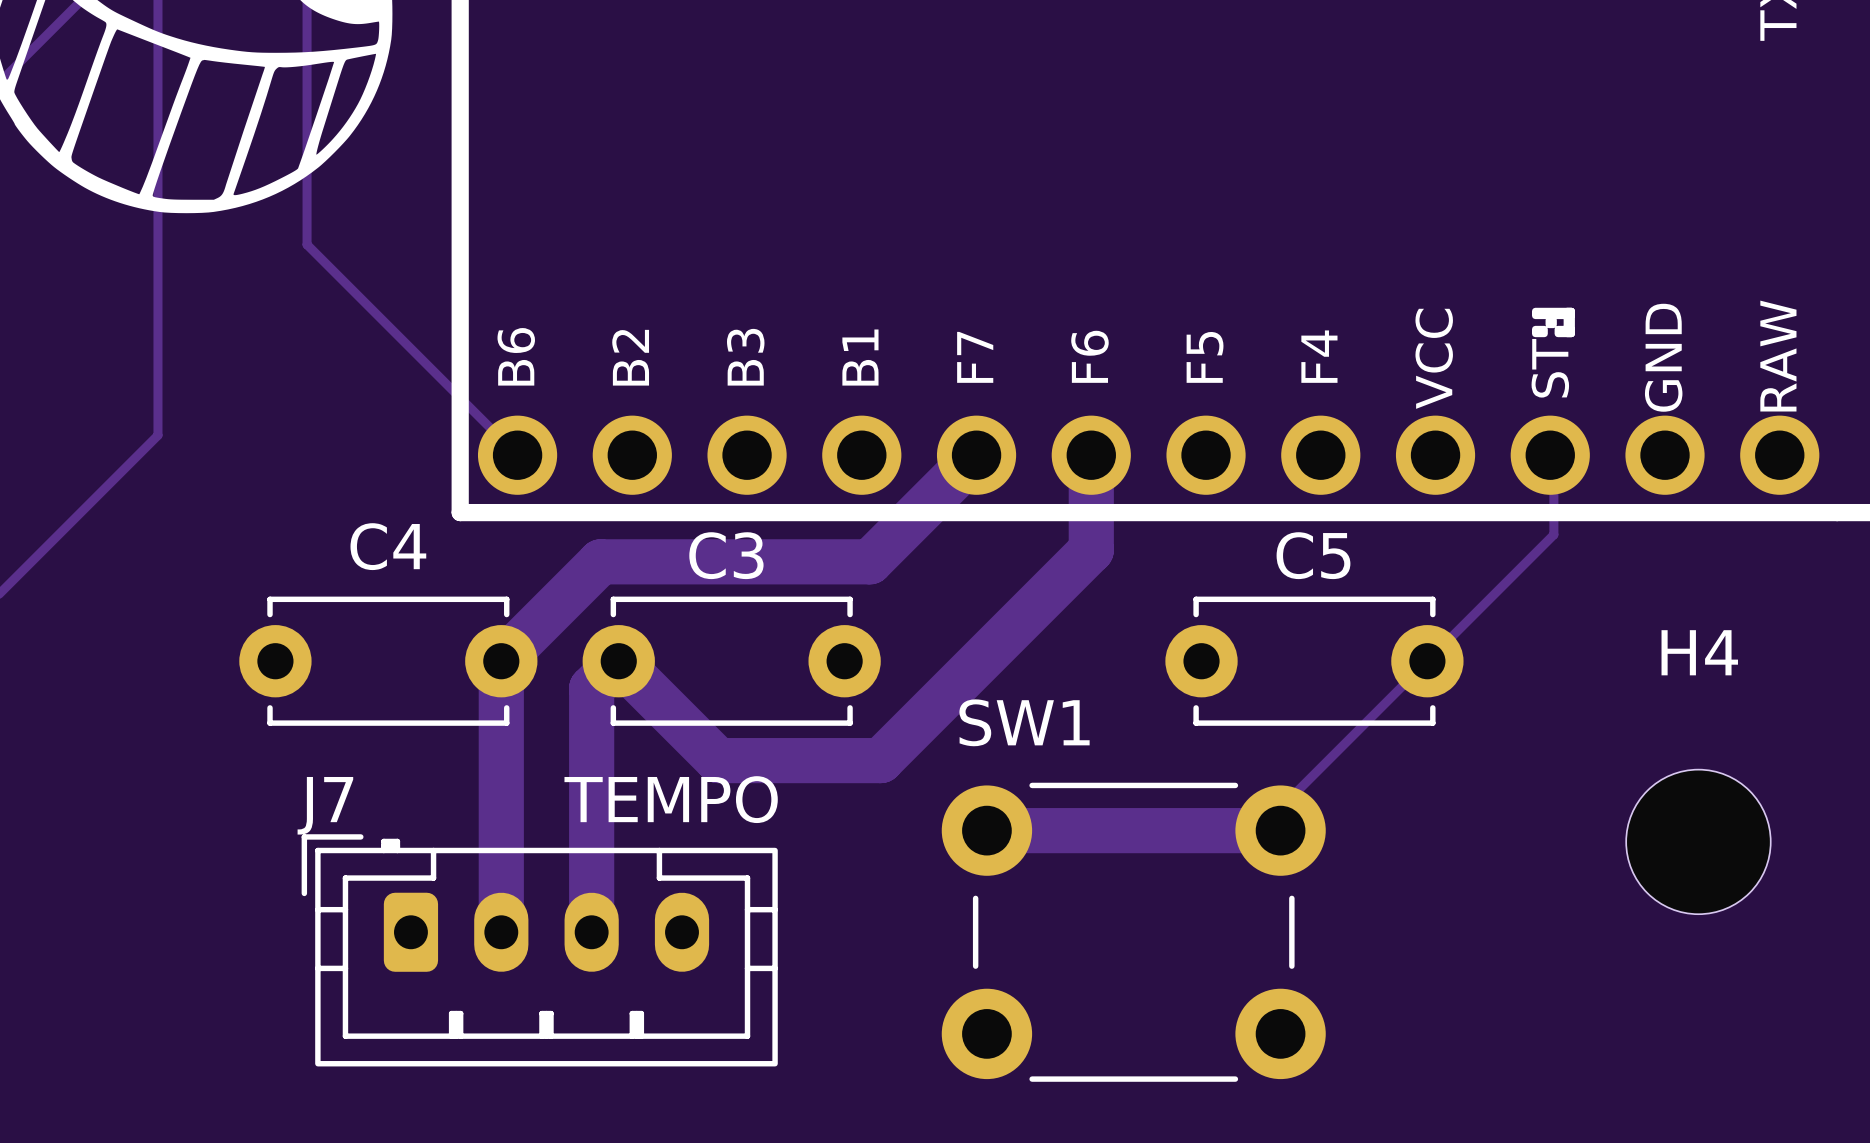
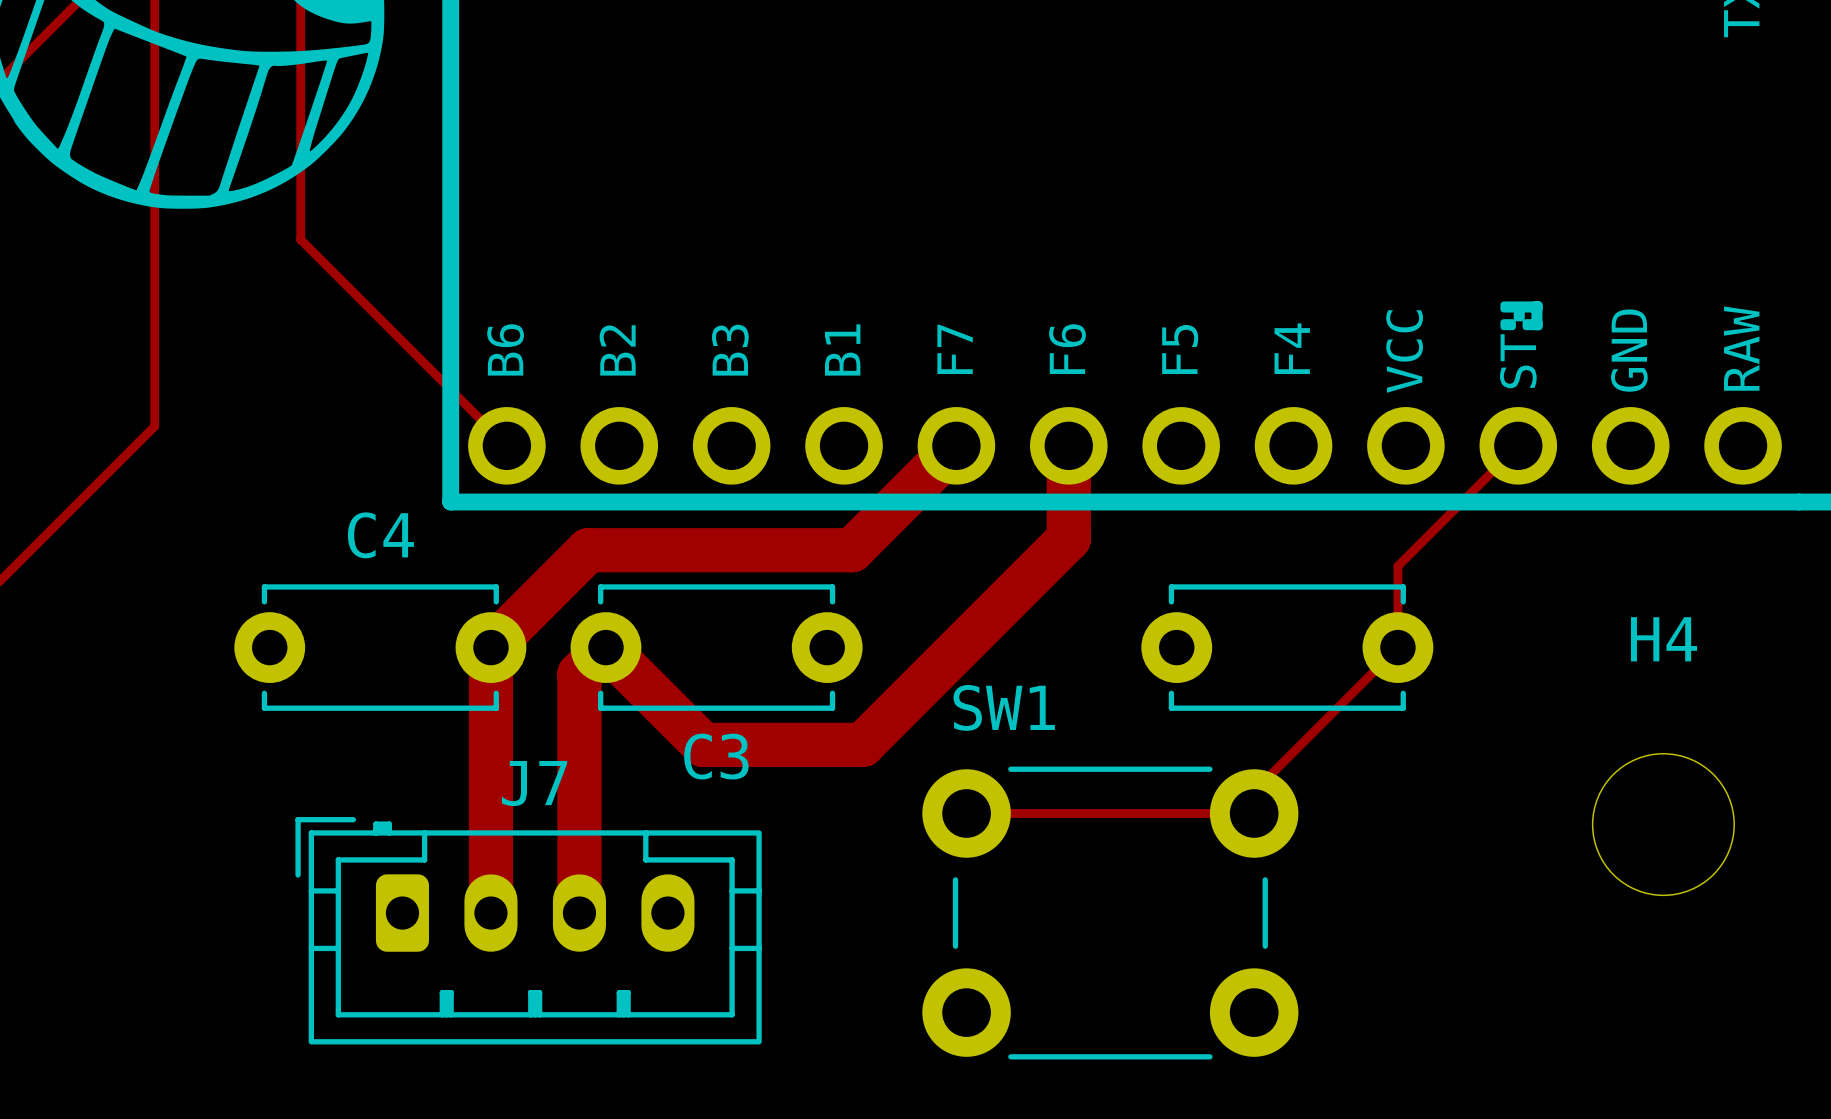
track: (1550, 455) (1553, 458) (1553, 534) (1427, 661) -> (1518, 445) (1397, 566) (1397, 647)
C3 name position: C3 (726, 555) -> C3 (716, 756)
C5 name: C5 (1313, 555) -> none
J7 value: TEMPO (671, 799) -> none
J7 name position: J7 (325, 805) -> J7 (534, 783)
track width: thick (986, 830) (1280, 830) -> thin (966, 813) (1254, 813)

